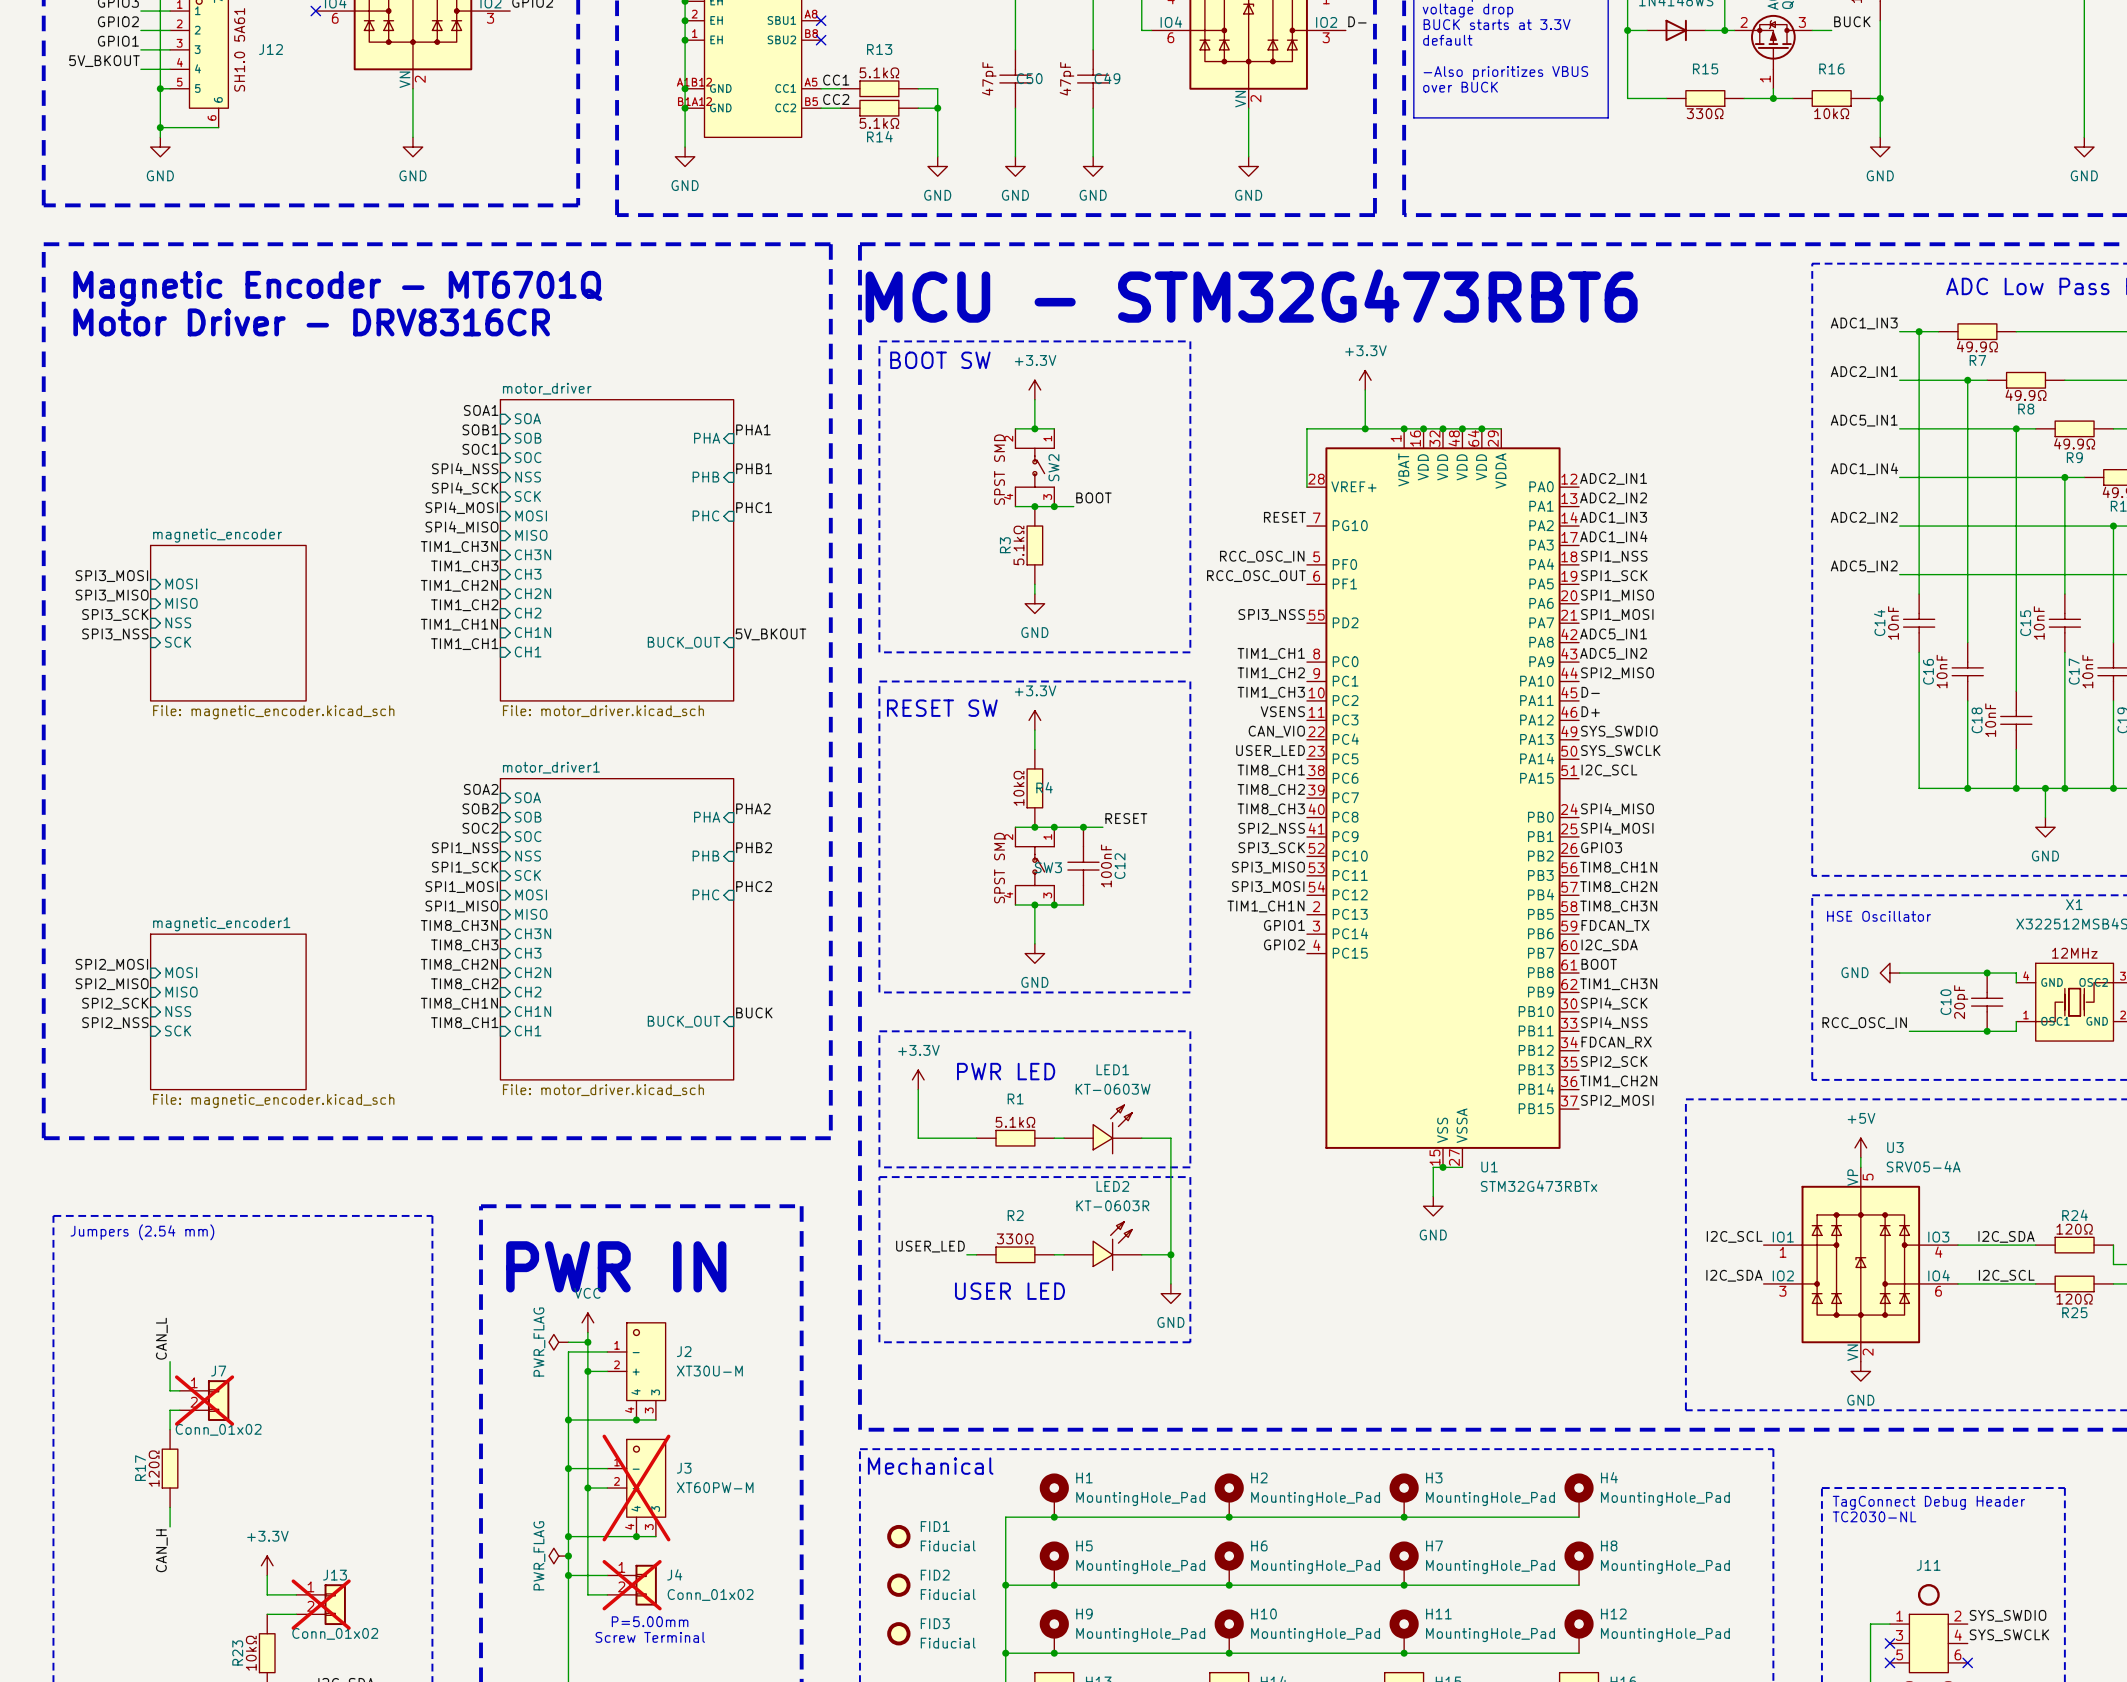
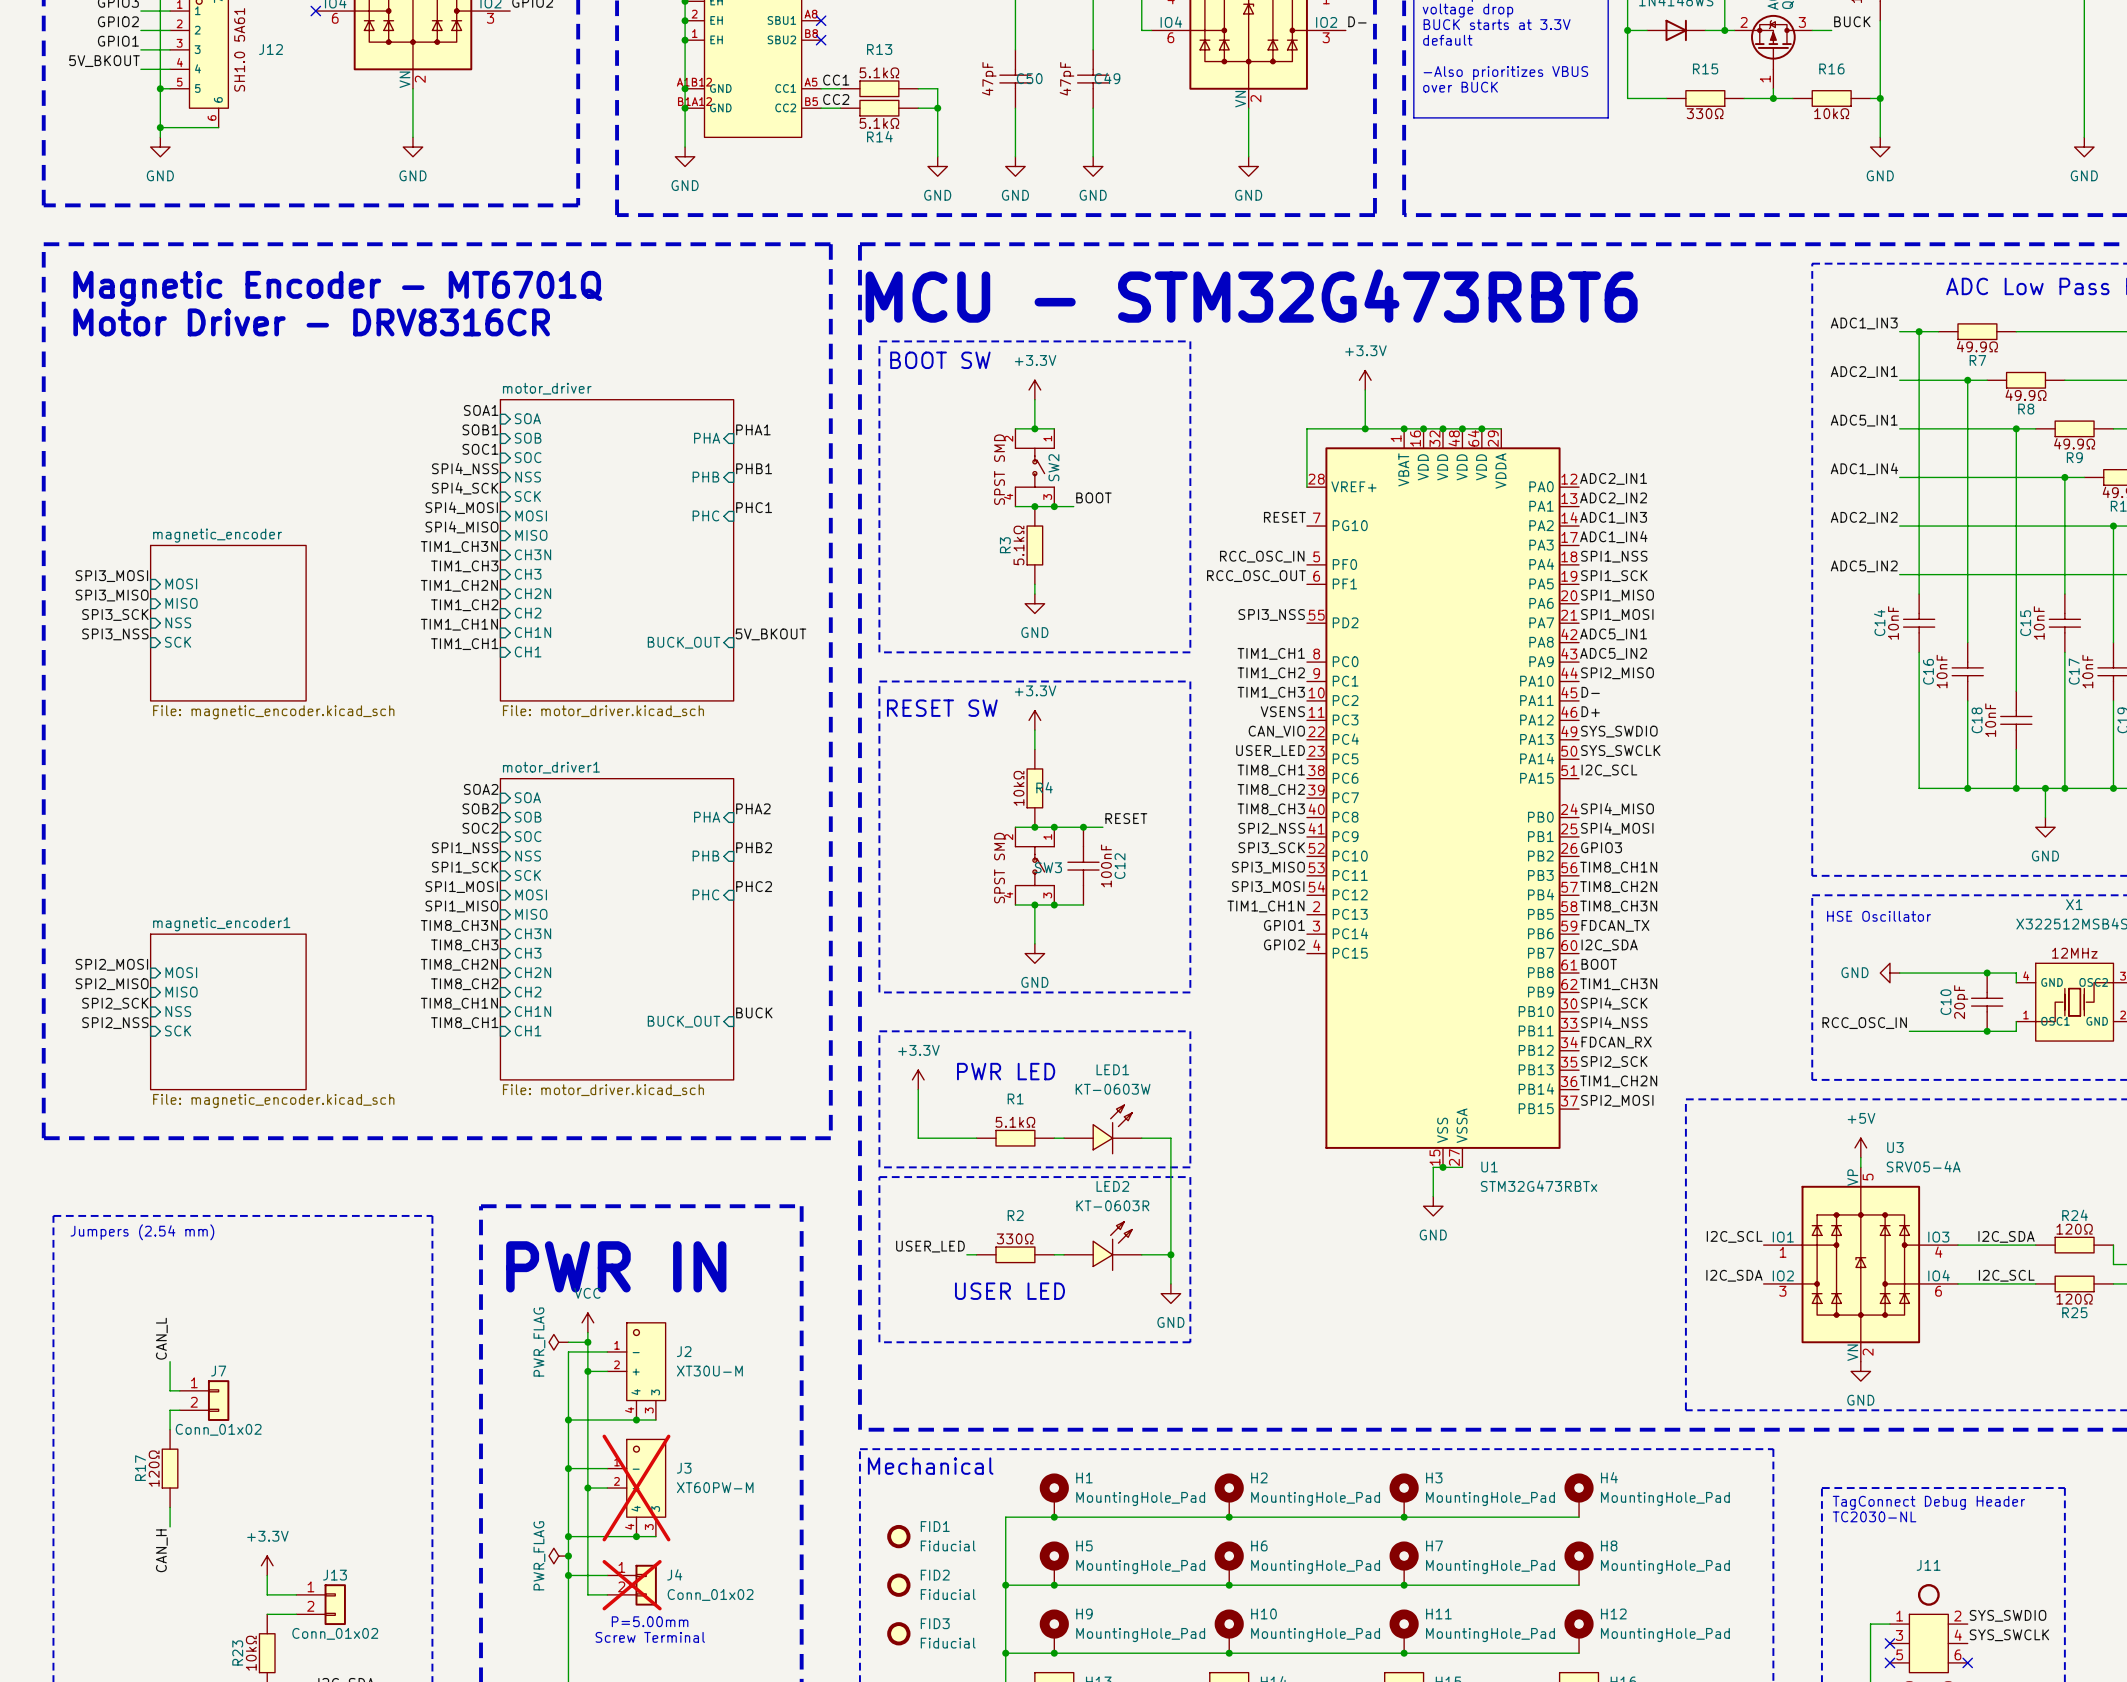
J7 do-not-place cross: (204, 1400) -> none
J13 do-not-place cross: (321, 1604) -> none

